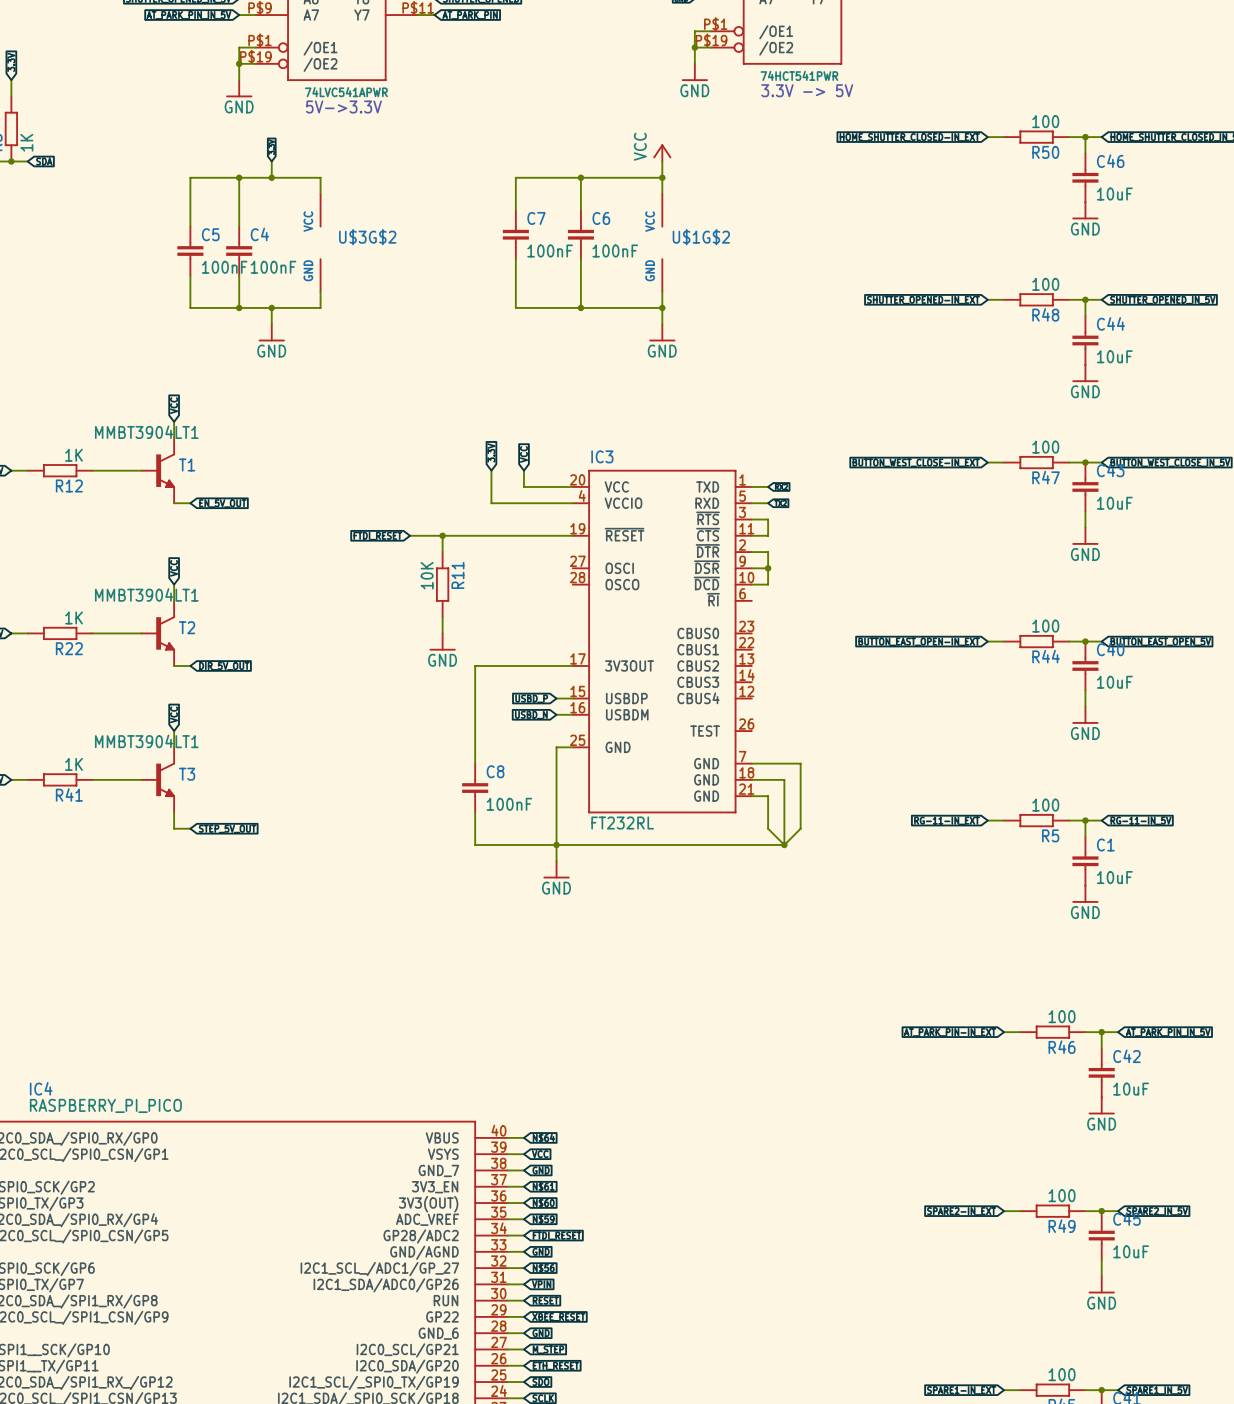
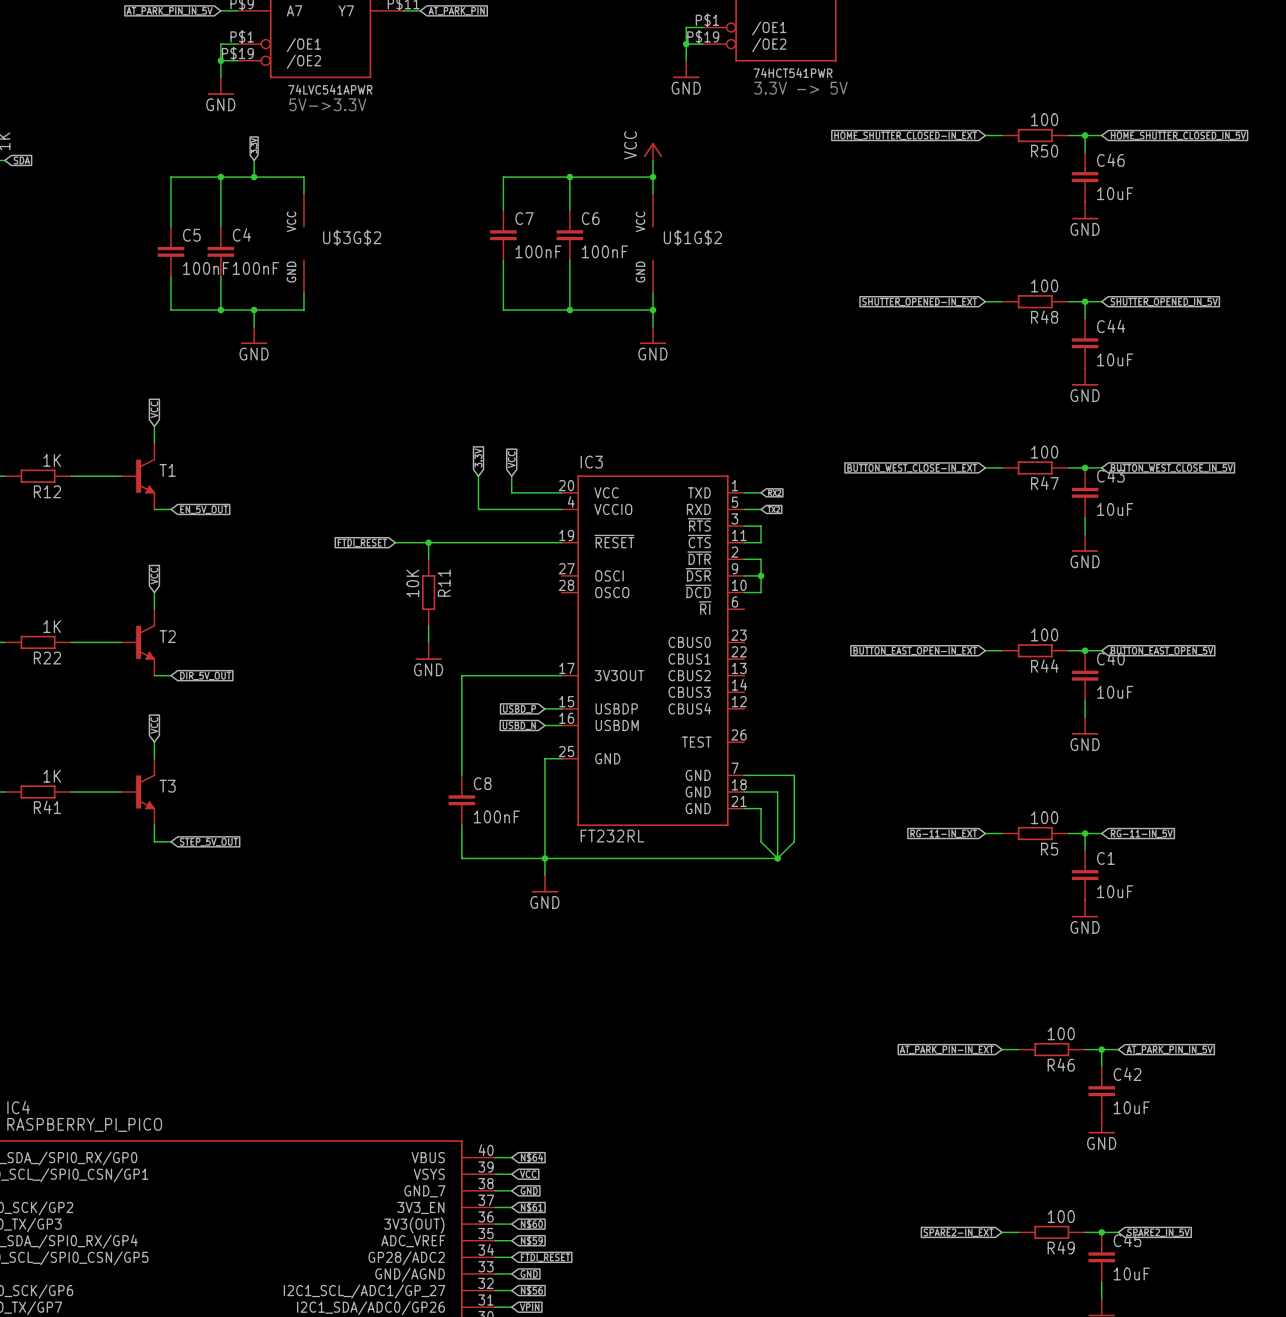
T1 value: MMBT3904LT1 (146, 432) -> none
T2 value: MMBT3904LT1 (146, 594) -> none
T3 value: MMBT3904LT1 (146, 741) -> none

